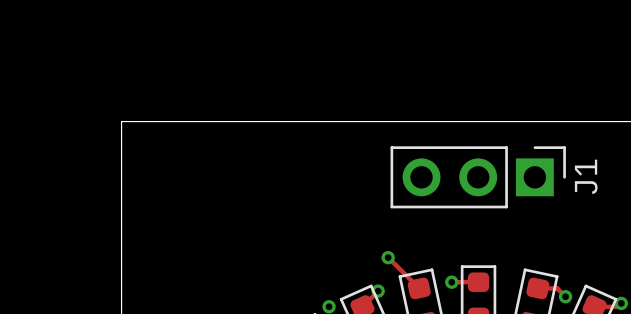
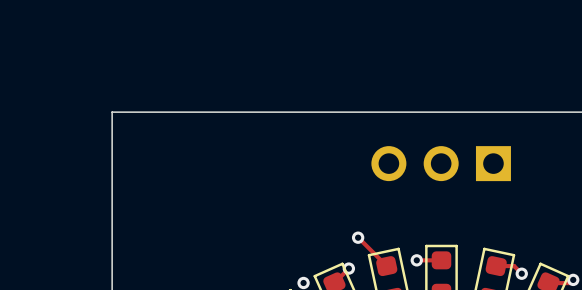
J1 side: top (478, 177) -> bottom (441, 163)

